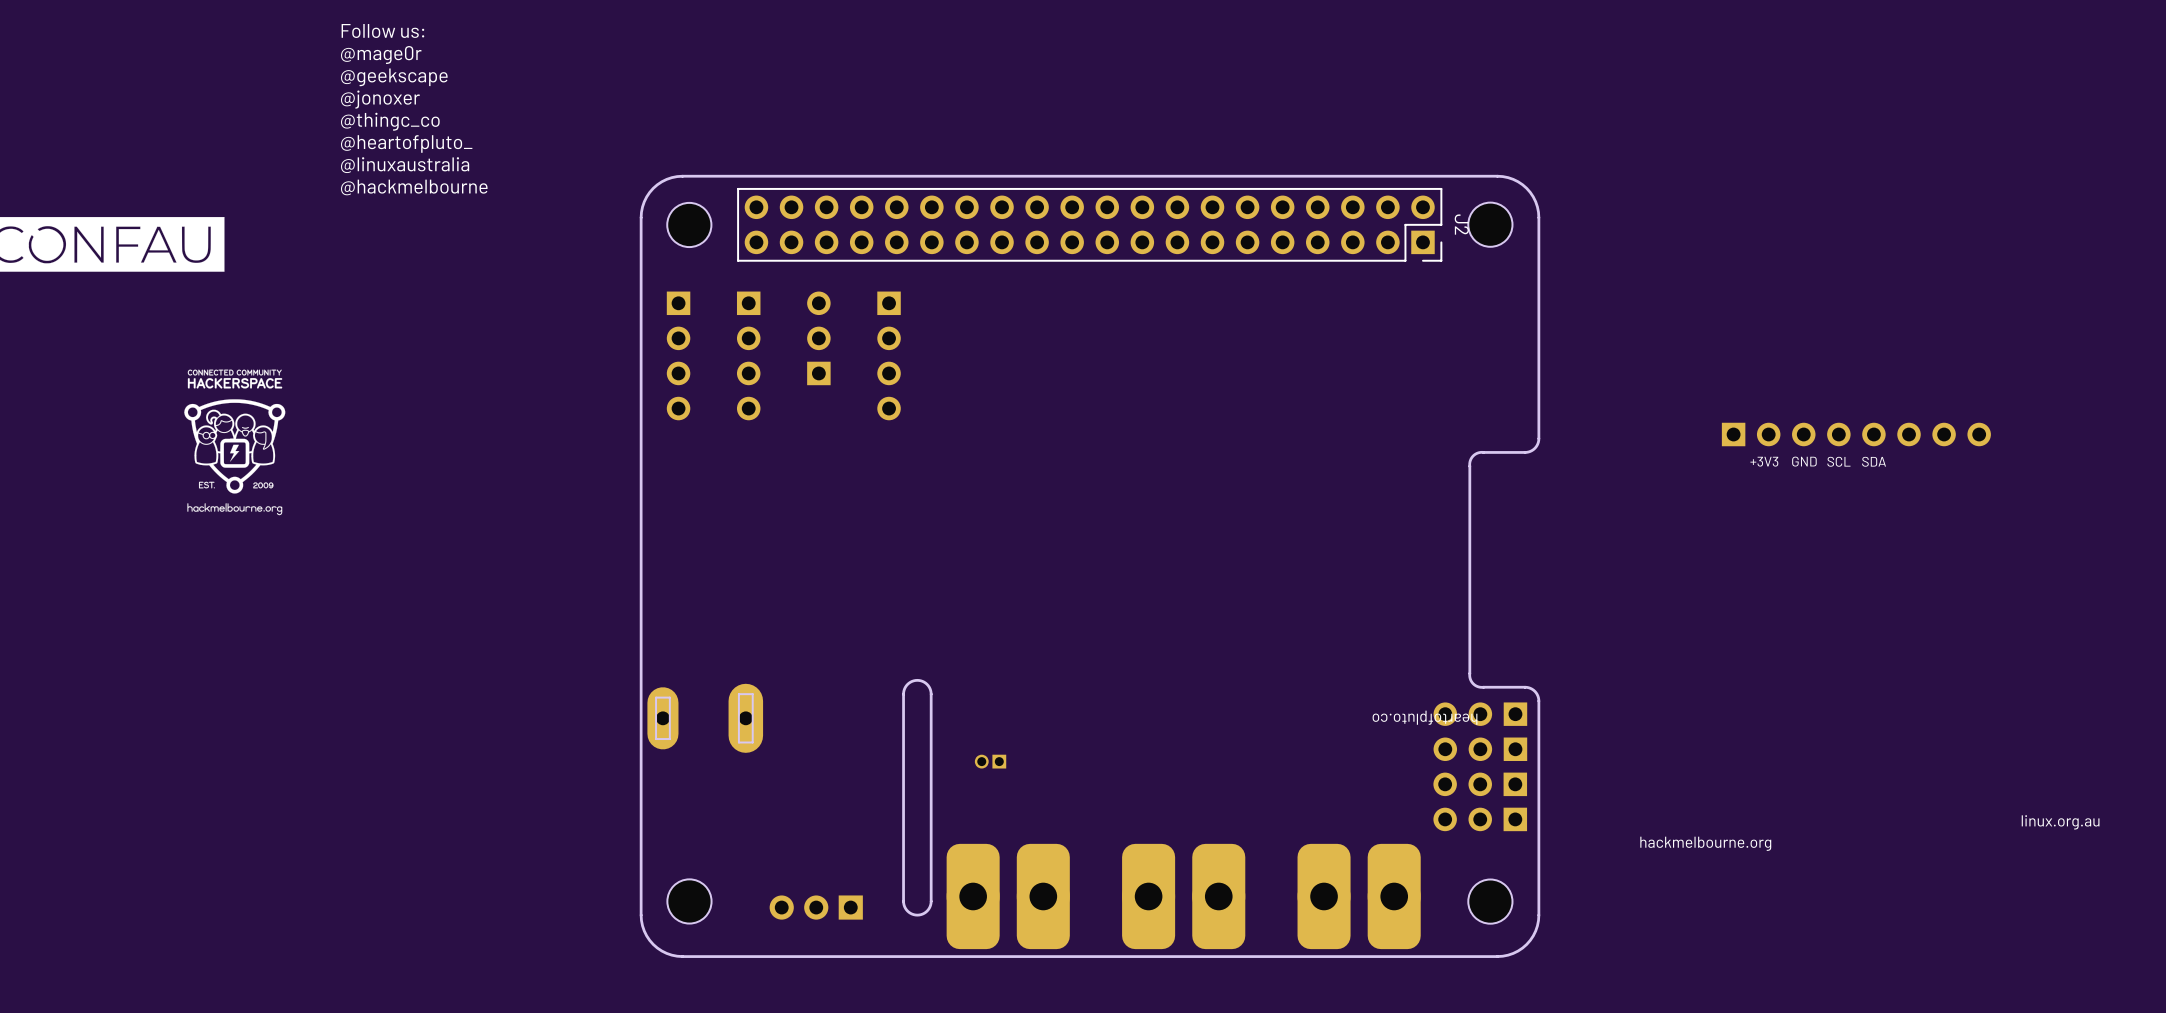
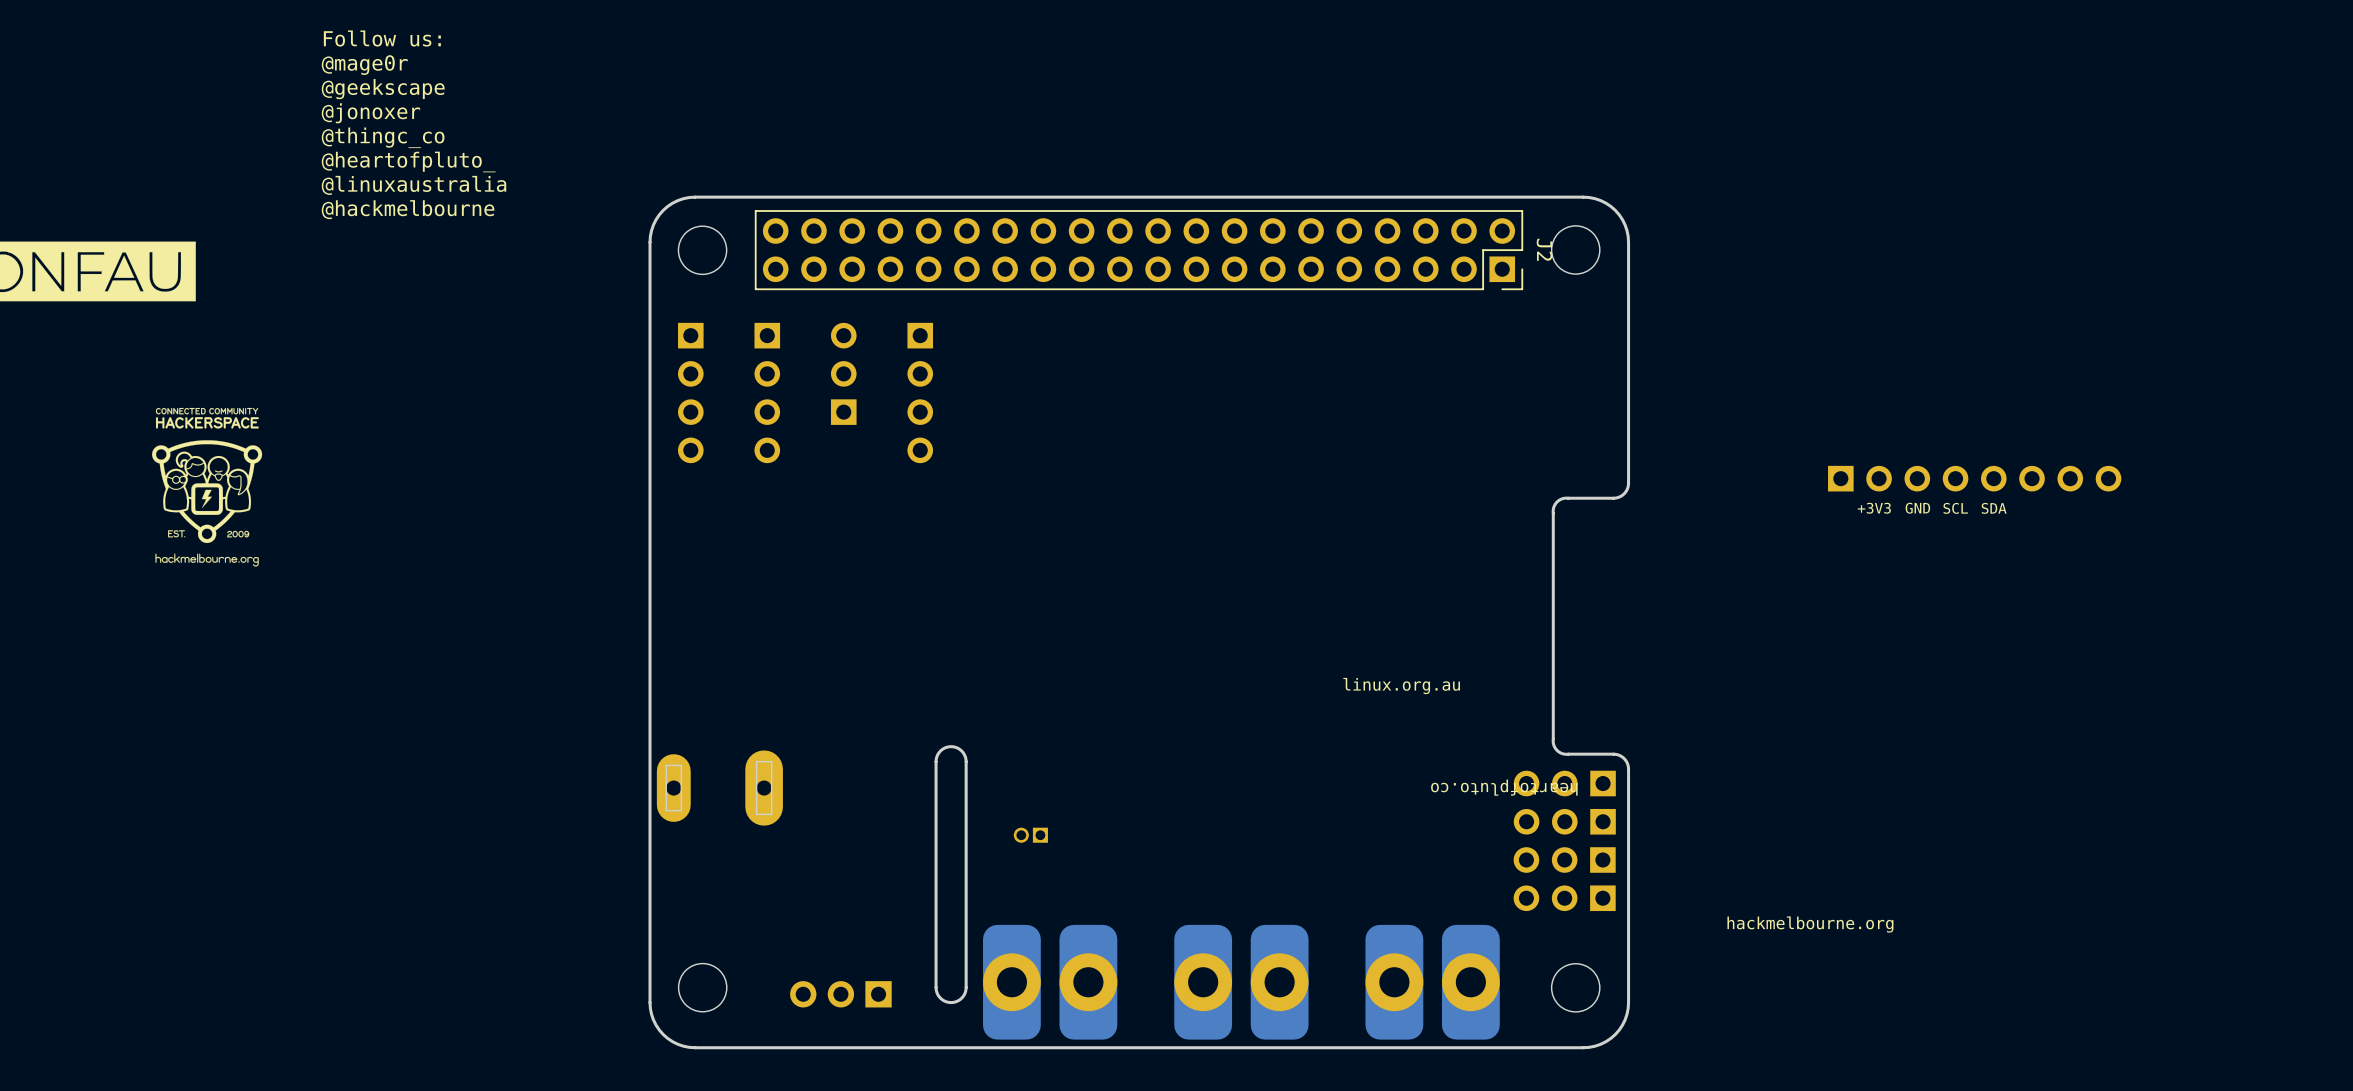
text: none -> linux.org.au (1401, 686)
text: linux.org.au (2060, 822) -> none

